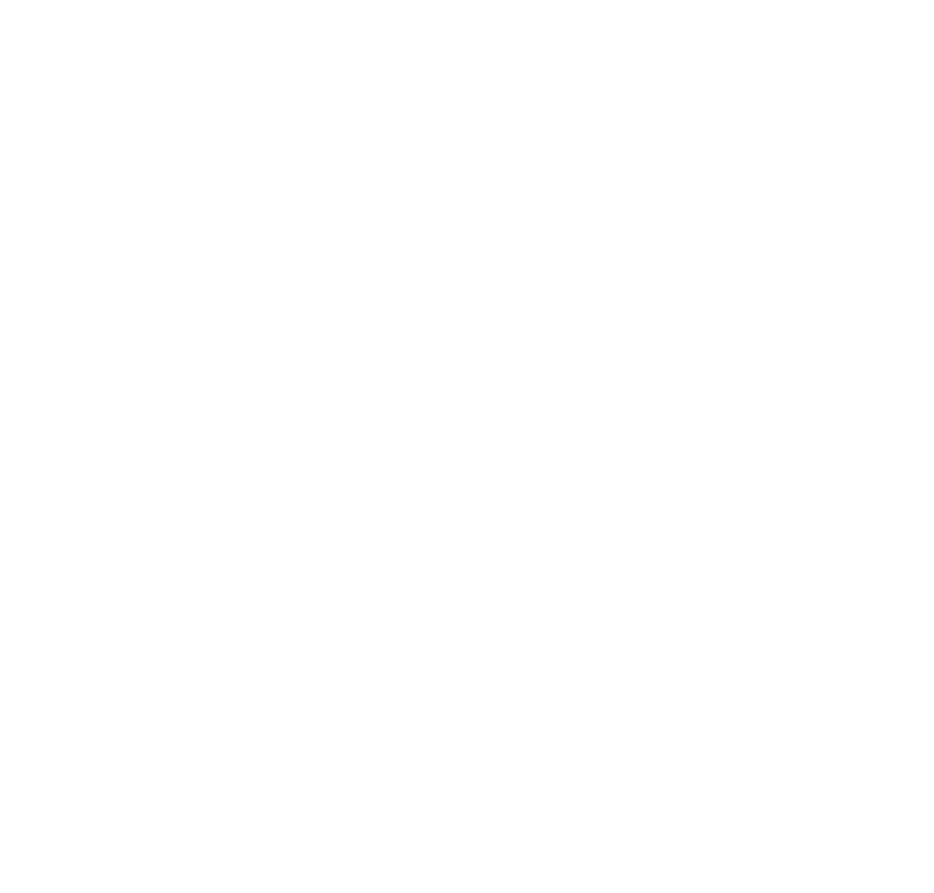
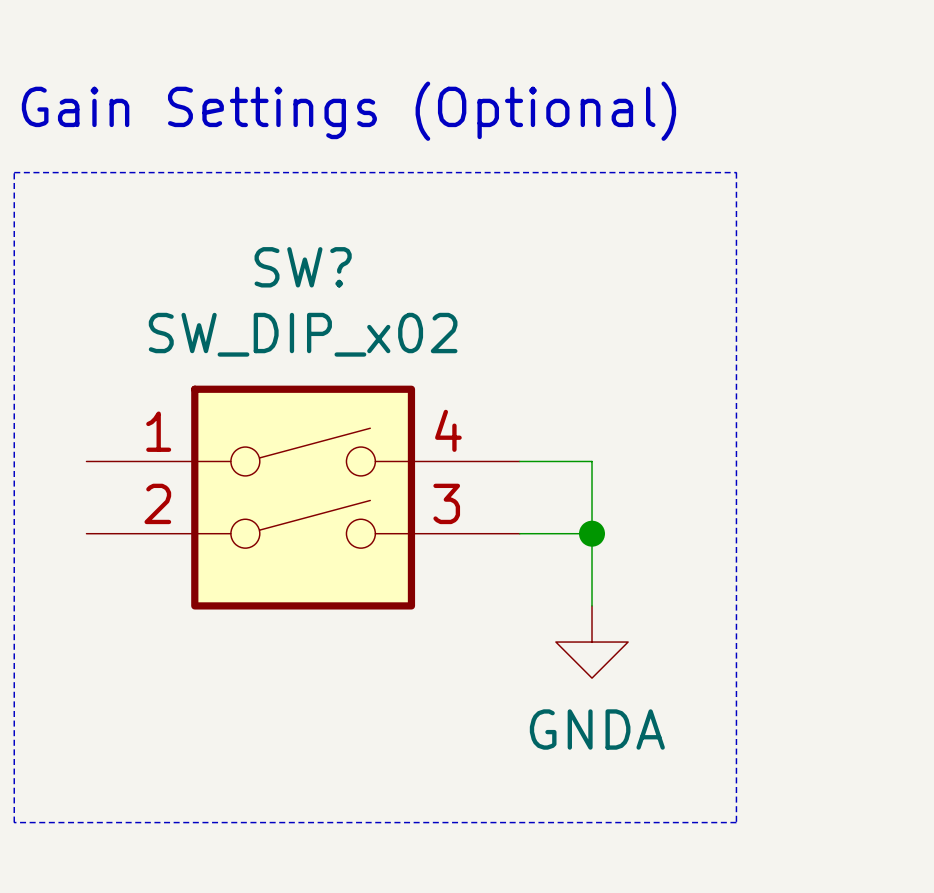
text: none -> Gain Settings (Optional) (348, 111)
line: none -> (14, 172) (736, 172) (736, 822) (14, 822) (14, 172)
wire: none -> (519, 461) (592, 461) (592, 605)
SW?: none -> SW_DIP_x02 (303, 497)
wire: none -> (519, 533) (592, 533)
junction: none -> (592, 533)
power symbol: none -> GNDA (592, 642)

